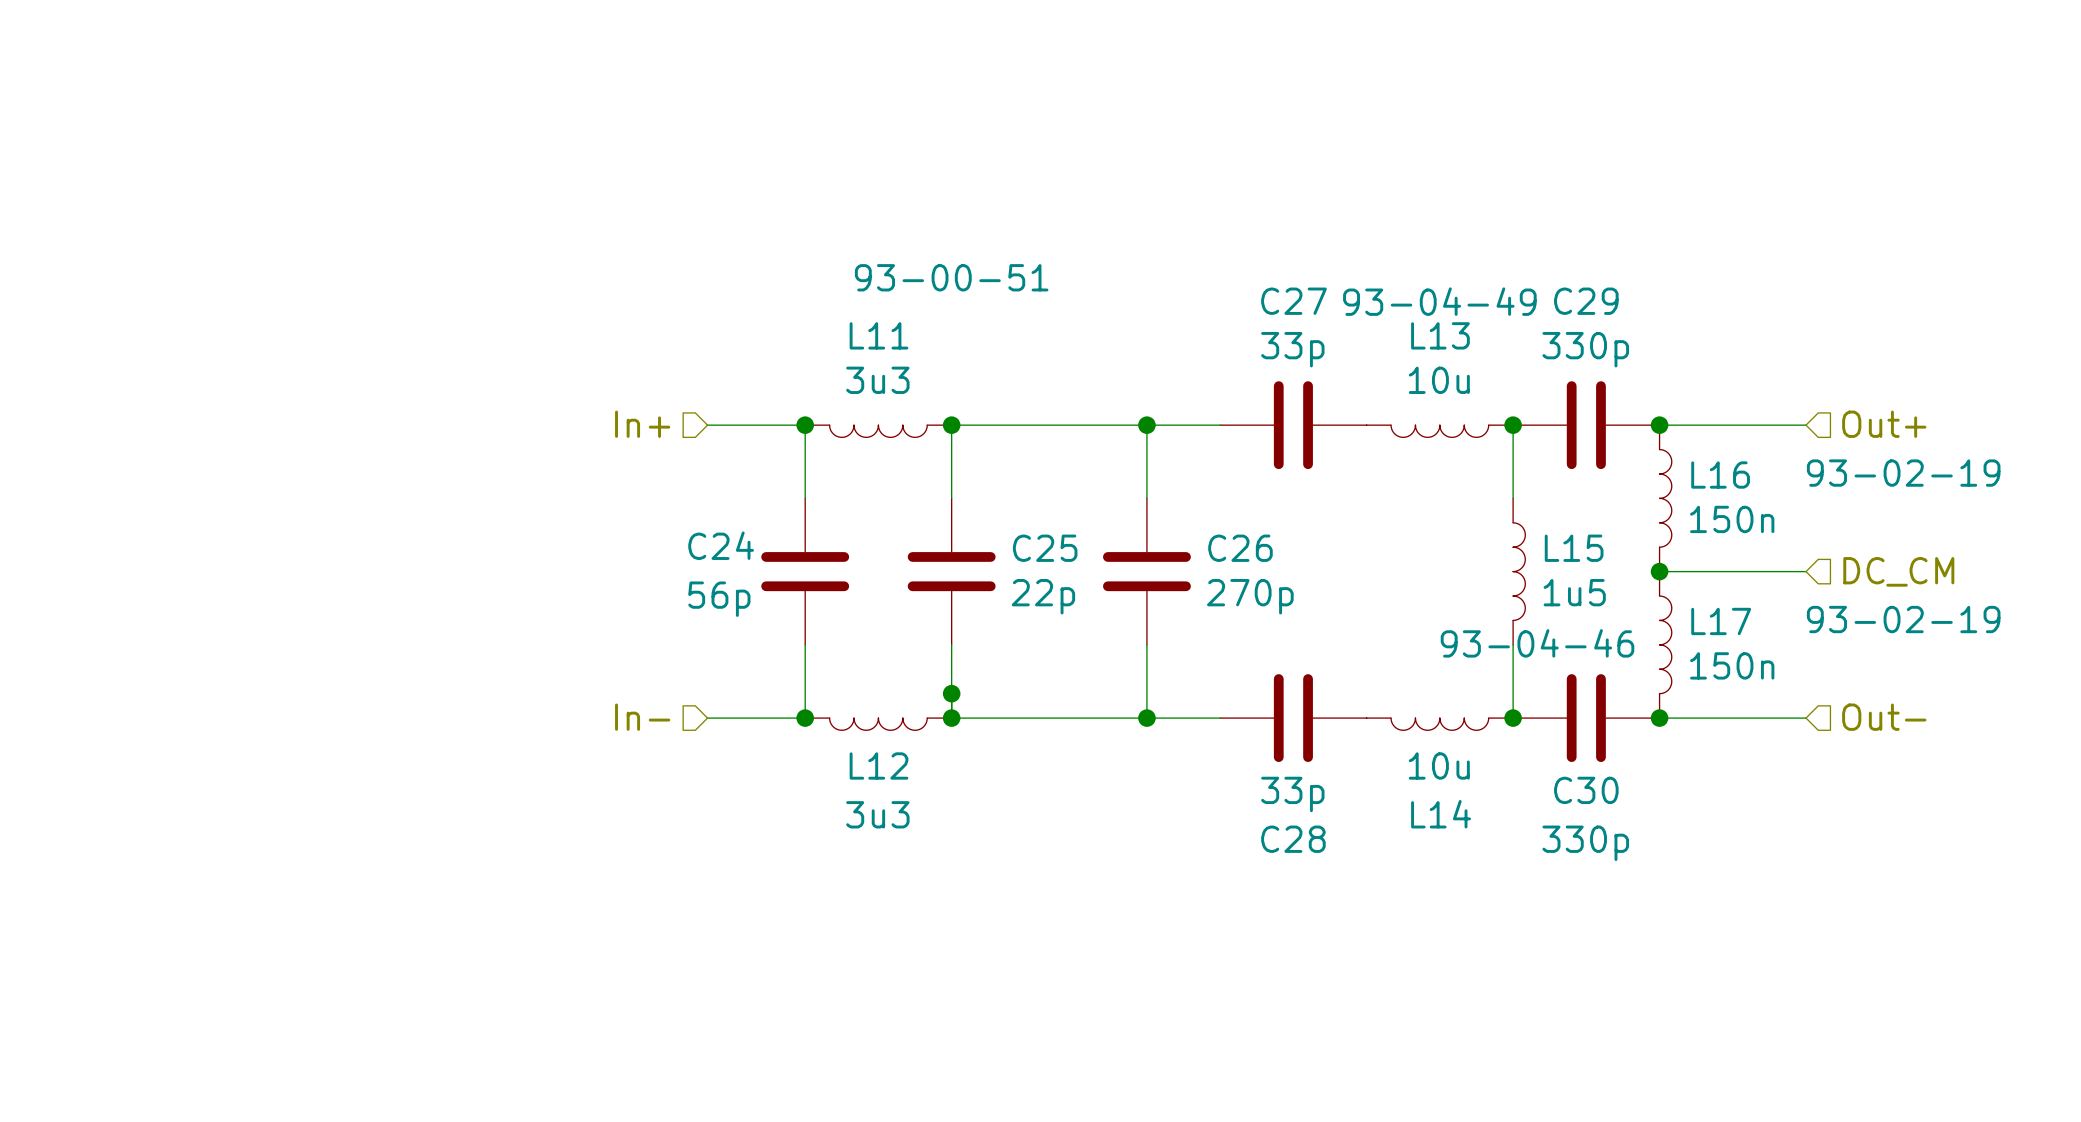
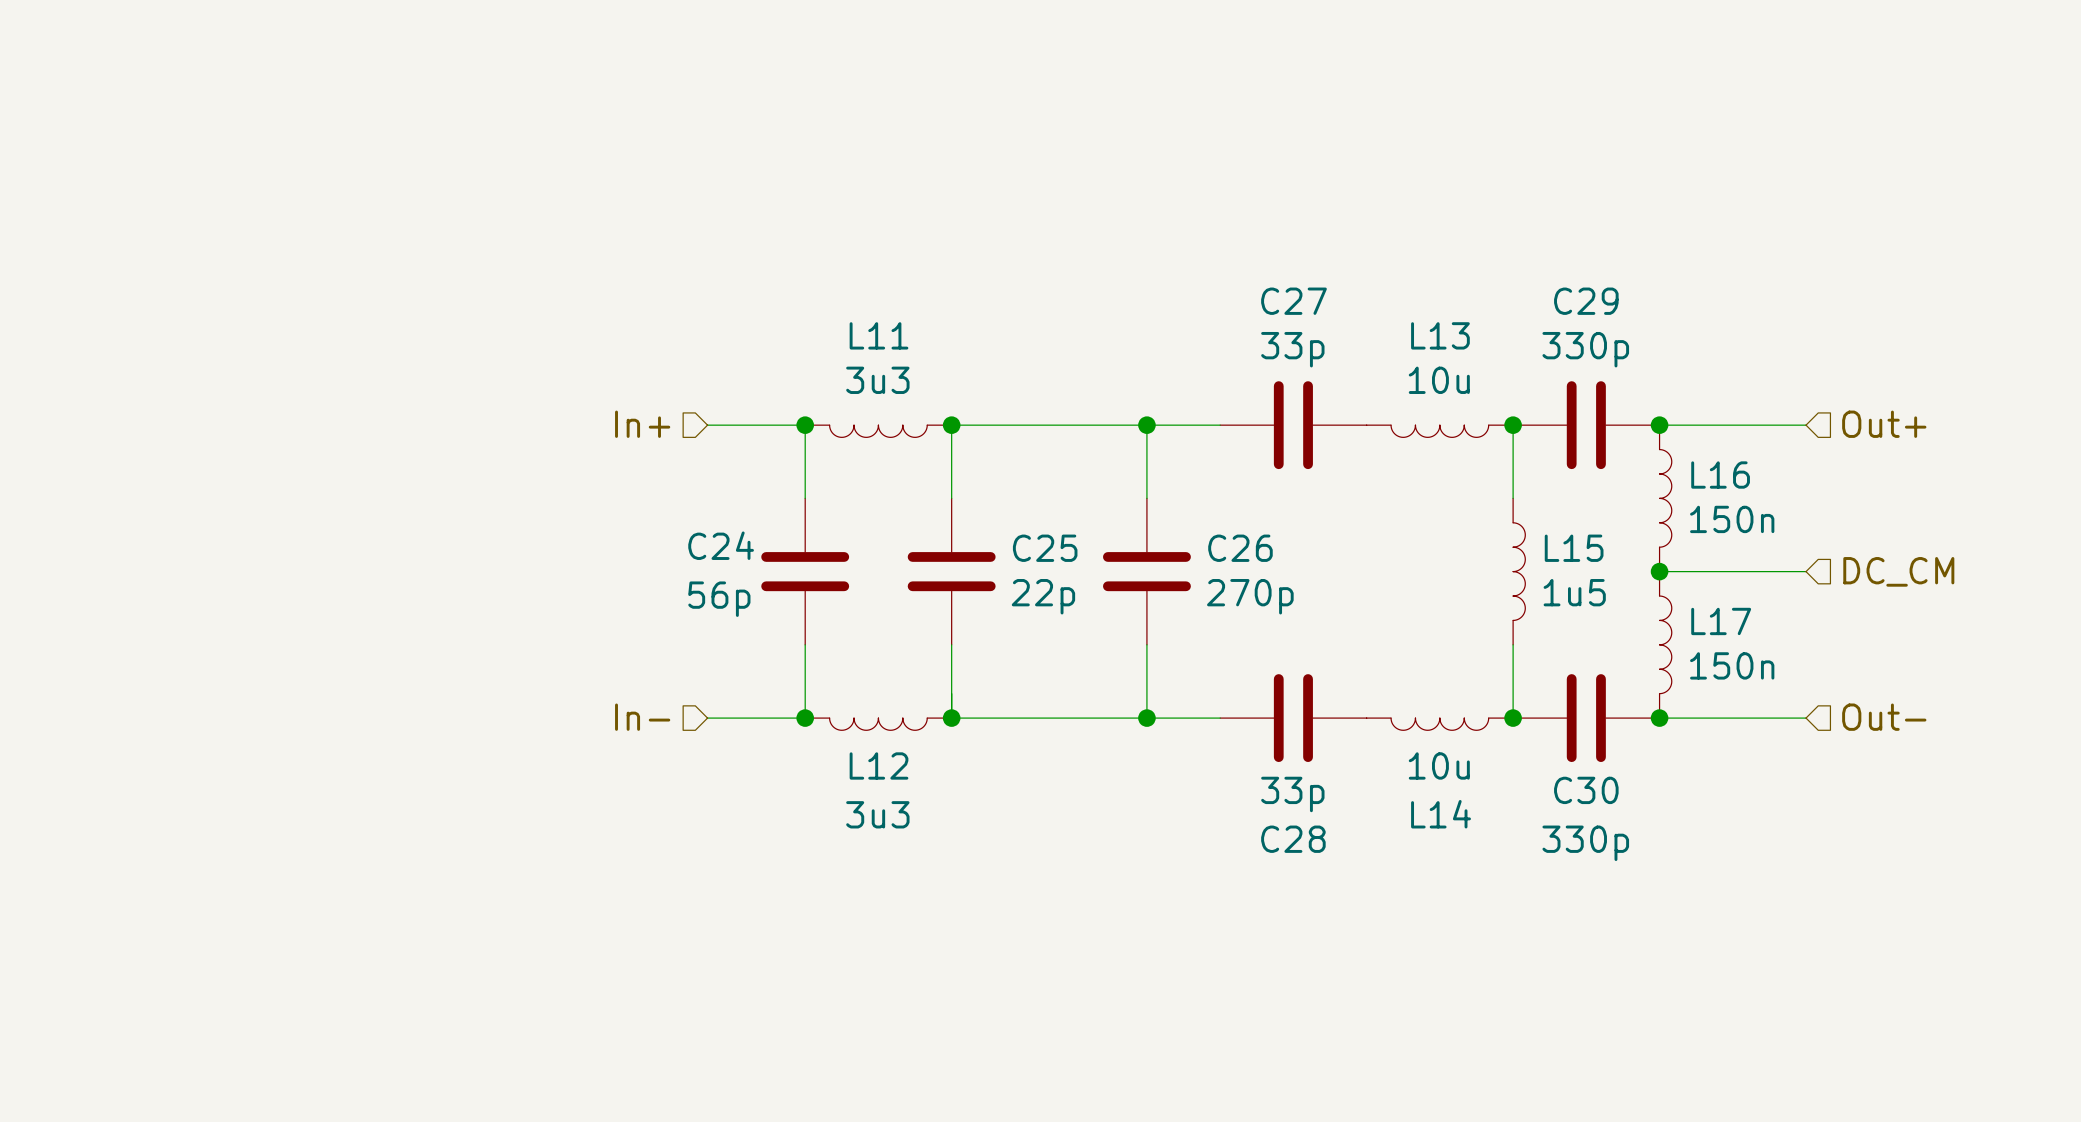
L11 text: 93-00-51 (951, 277) -> none
L13 text: 93-04-49 (1439, 301) -> none
L16 text: 93-02-19 (1903, 473) -> none
L17 text: 93-02-19 (1903, 619) -> none
L15 text: 93-04-46 (1537, 643) -> none
junction: (951, 693) -> none

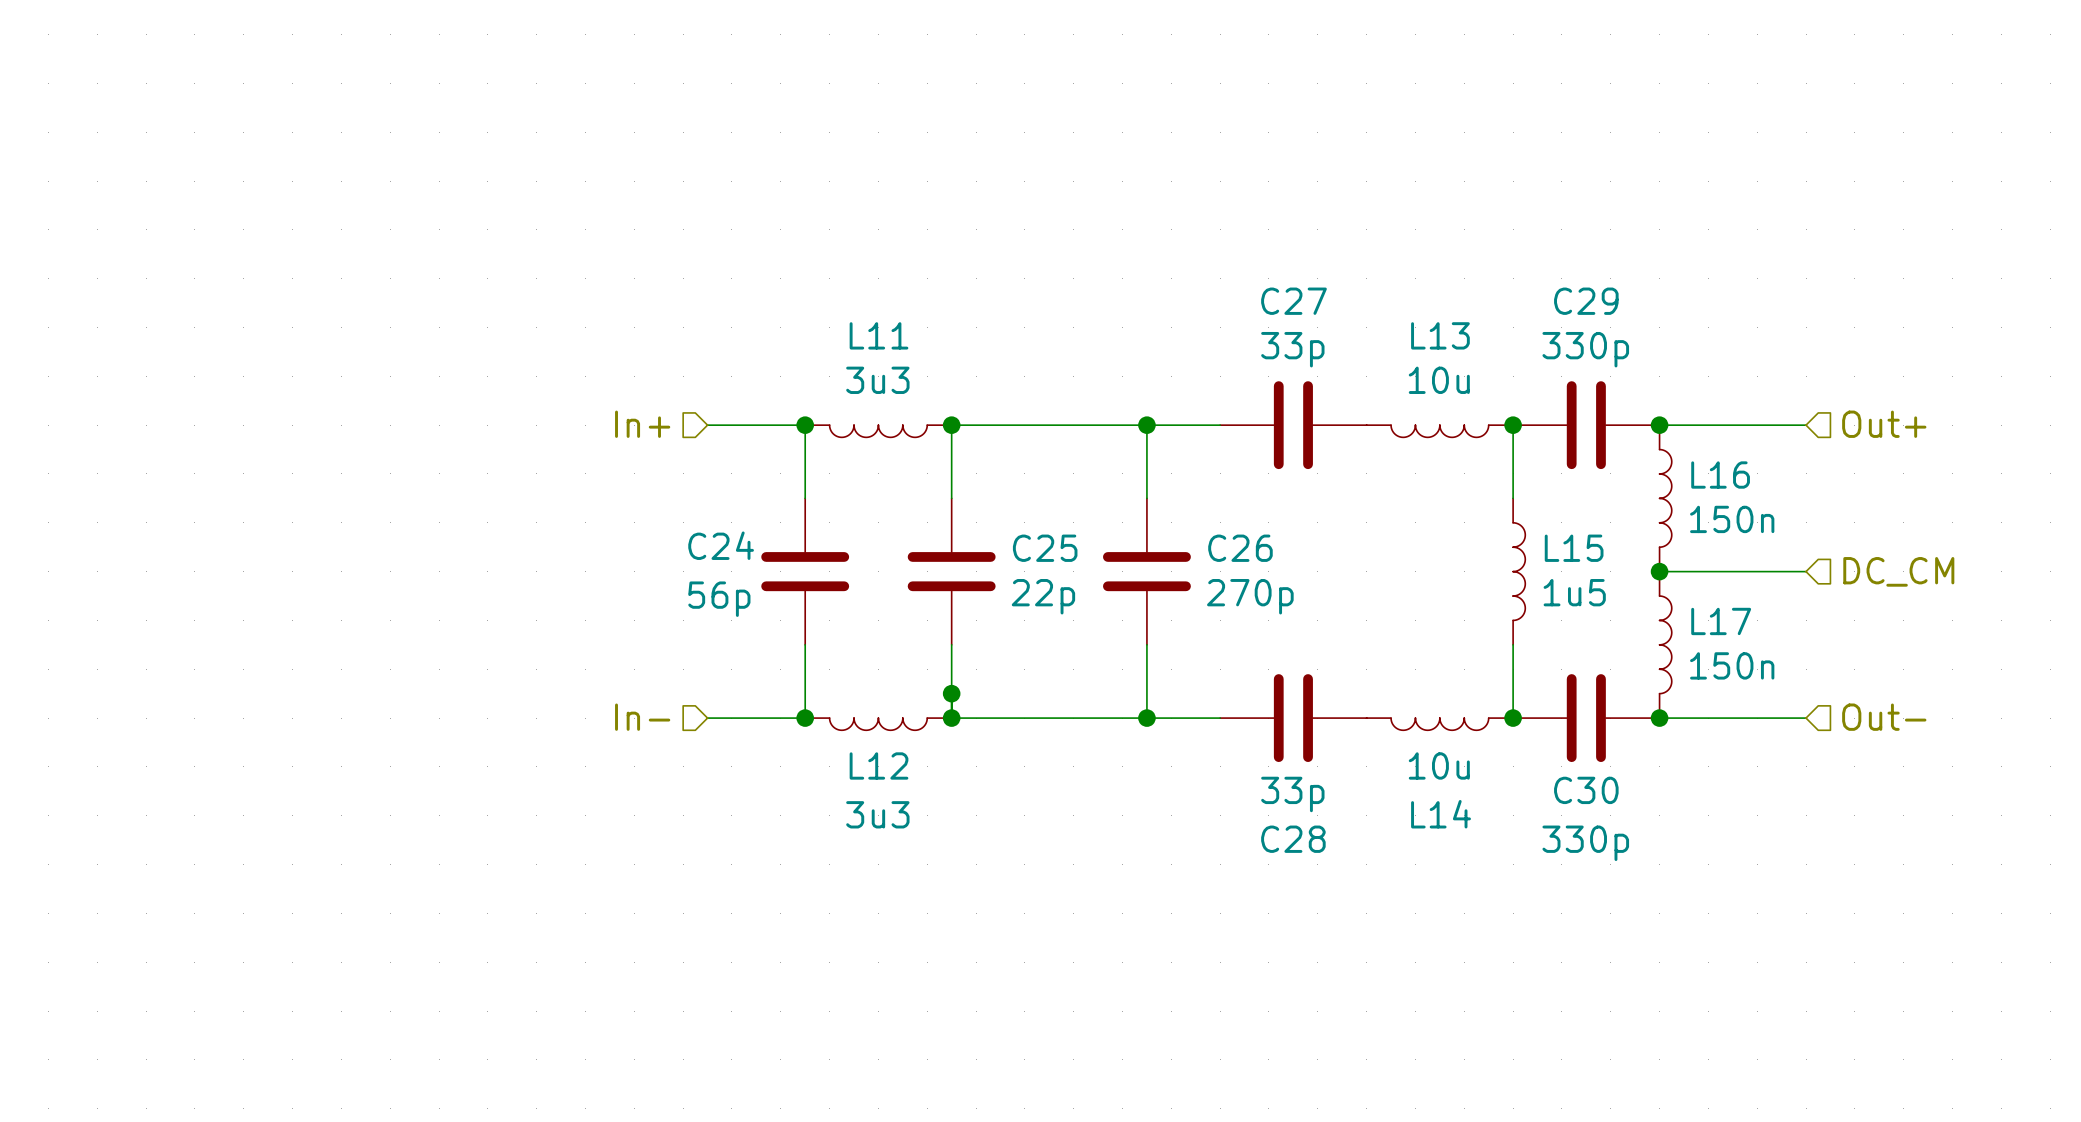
junction: none -> (951, 693)

